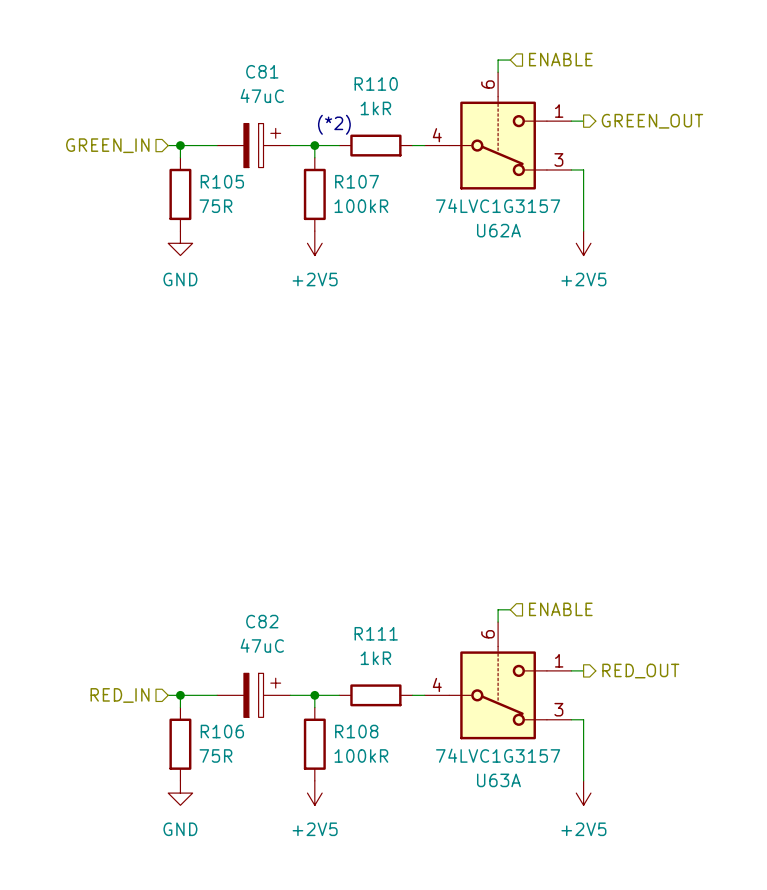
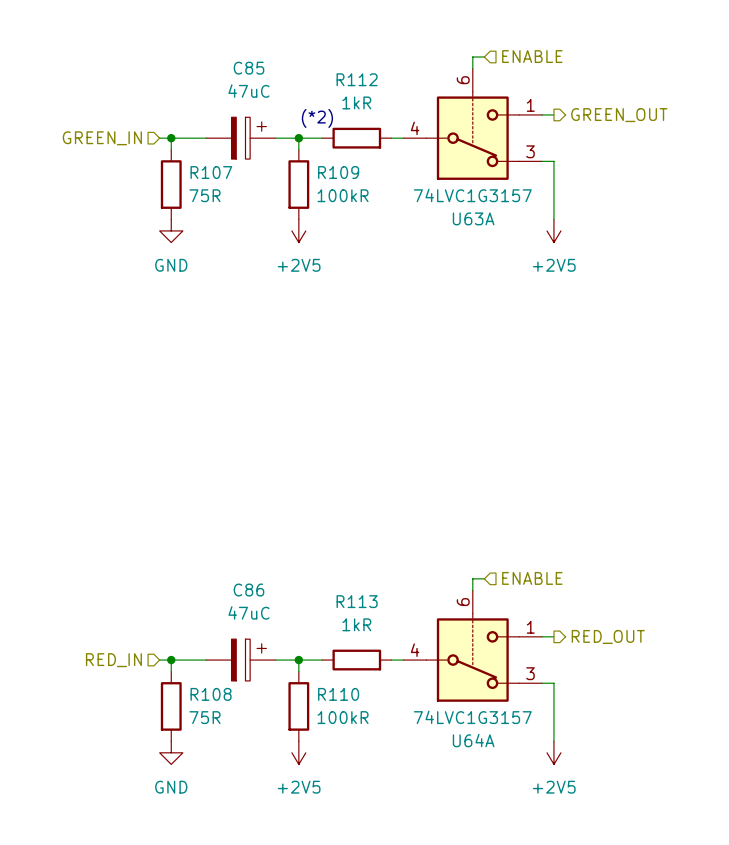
C81 name: C81 (262, 71) -> C85 (248, 68)
R110 name: R110 (376, 84) -> R112 (357, 79)
R105 name: R105 (222, 181) -> R107 (211, 172)
R107 name: R107 (357, 181) -> R109 (338, 172)
U62A name: U62A (498, 230) -> U63A (473, 218)
C82 name: C82 (262, 621) -> C86 (248, 590)
R111 name: R111 (376, 633) -> R113 (357, 601)
R106 name: R106 (222, 731) -> R108 (211, 694)
R108 name: R108 (356, 731) -> R110 (338, 694)
U63A name: U63A (498, 780) -> U64A (473, 740)

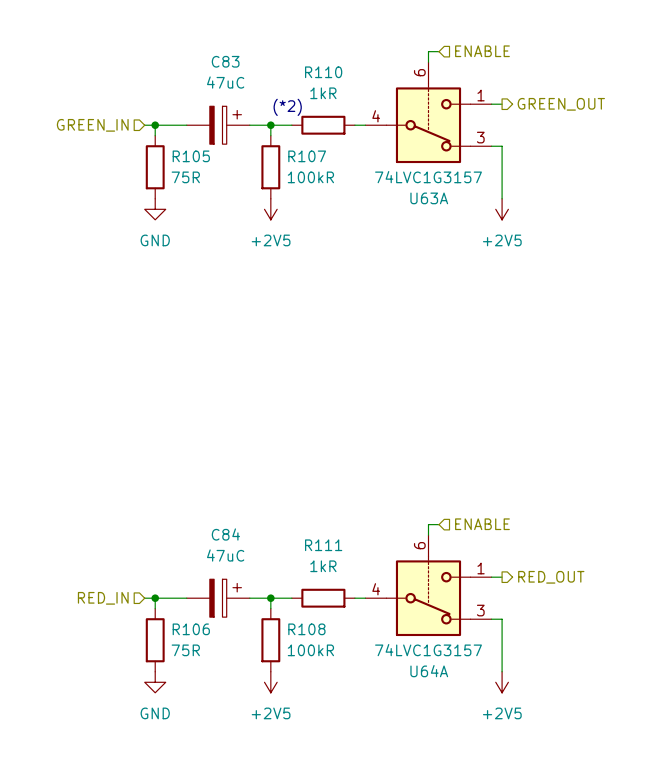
C85 name: C85 (248, 68) -> C83 (225, 61)
R112 name: R112 (357, 79) -> R110 (323, 72)
R107 name: R107 (211, 172) -> R105 (191, 156)
R109 name: R109 (338, 172) -> R107 (307, 156)
C86 name: C86 (248, 590) -> C84 (225, 534)
R113 name: R113 (357, 601) -> R111 (323, 545)
R108 name: R108 (211, 694) -> R106 (191, 629)
R110 name: R110 (338, 694) -> R108 (306, 629)

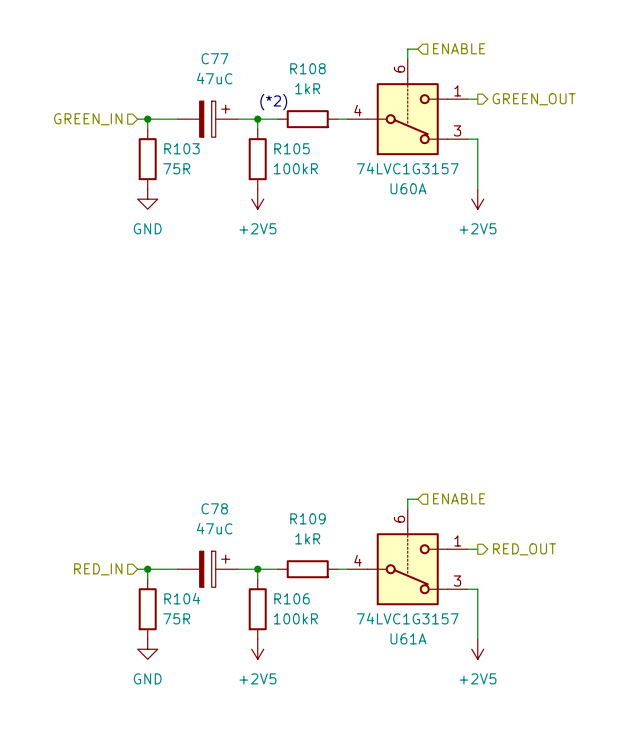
C83 name: C83 (225, 61) -> C77 (214, 58)
R110 name: R110 (323, 72) -> R108 (307, 68)
R105 name: R105 (191, 156) -> R103 (182, 148)
R107 name: R107 (307, 156) -> R105 (292, 148)
U63A name: U63A (429, 198) -> U60A (408, 188)
C84 name: C84 (225, 534) -> C78 (214, 508)
R111 name: R111 (323, 545) -> R109 (307, 518)
R106 name: R106 (191, 629) -> R104 (182, 598)
R108 name: R108 (306, 629) -> R106 (292, 598)
U64A name: U64A (429, 671) -> U61A (408, 638)

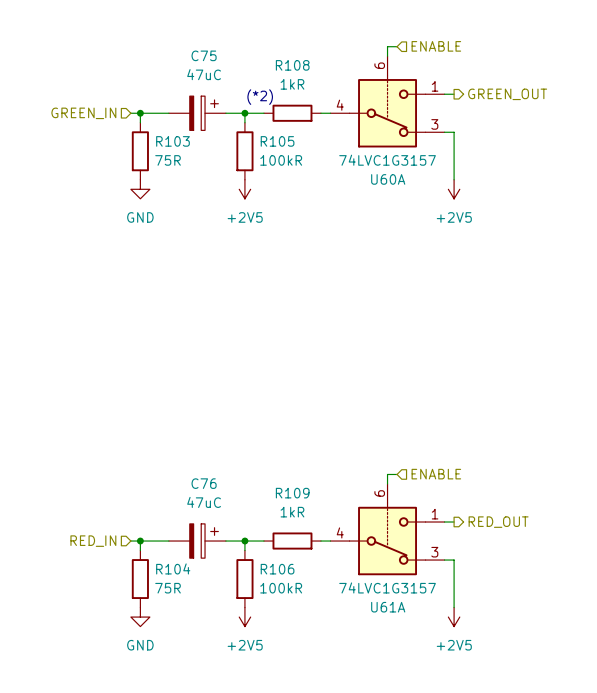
C77 name: C77 (214, 58) -> C75 (204, 55)
C78 name: C78 (214, 508) -> C76 (204, 483)

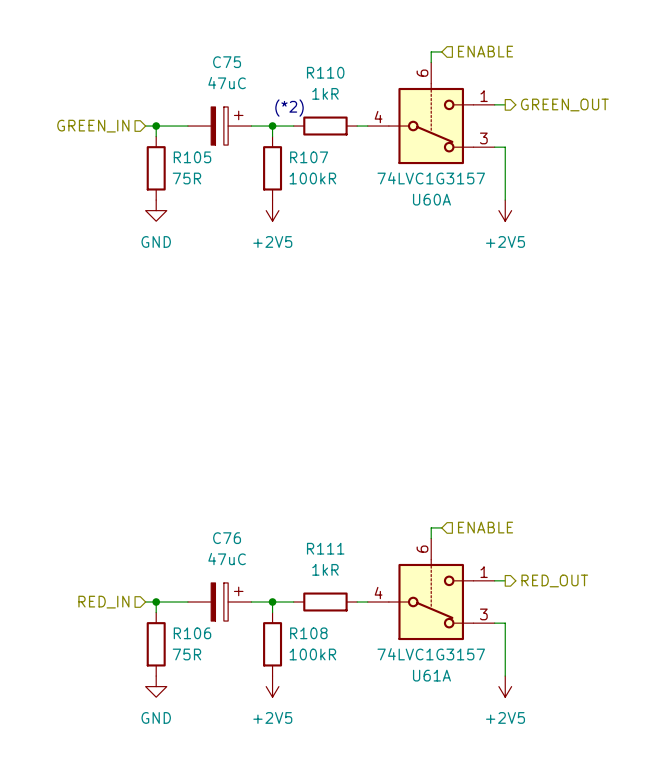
R108 name: R108 (292, 65) -> R110 (325, 72)
R103 name: R103 (173, 141) -> R105 (192, 157)
R105 name: R105 (277, 141) -> R107 (309, 157)
R109 name: R109 (292, 493) -> R111 (325, 548)
R104 name: R104 (173, 568) -> R106 (192, 633)
R106 name: R106 (277, 569) -> R108 (308, 633)

